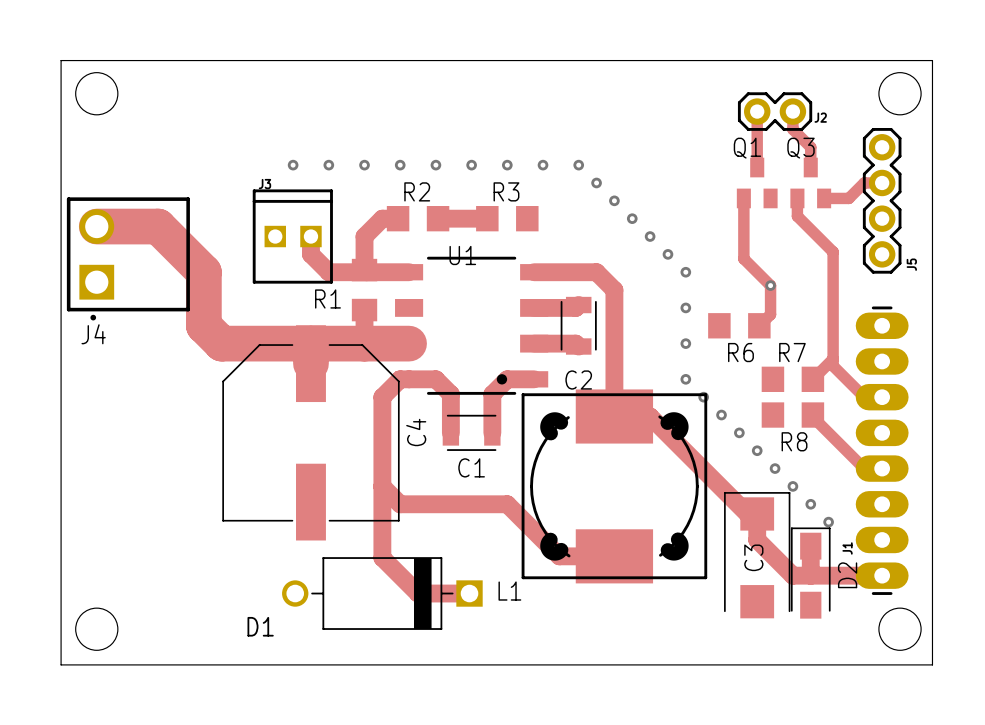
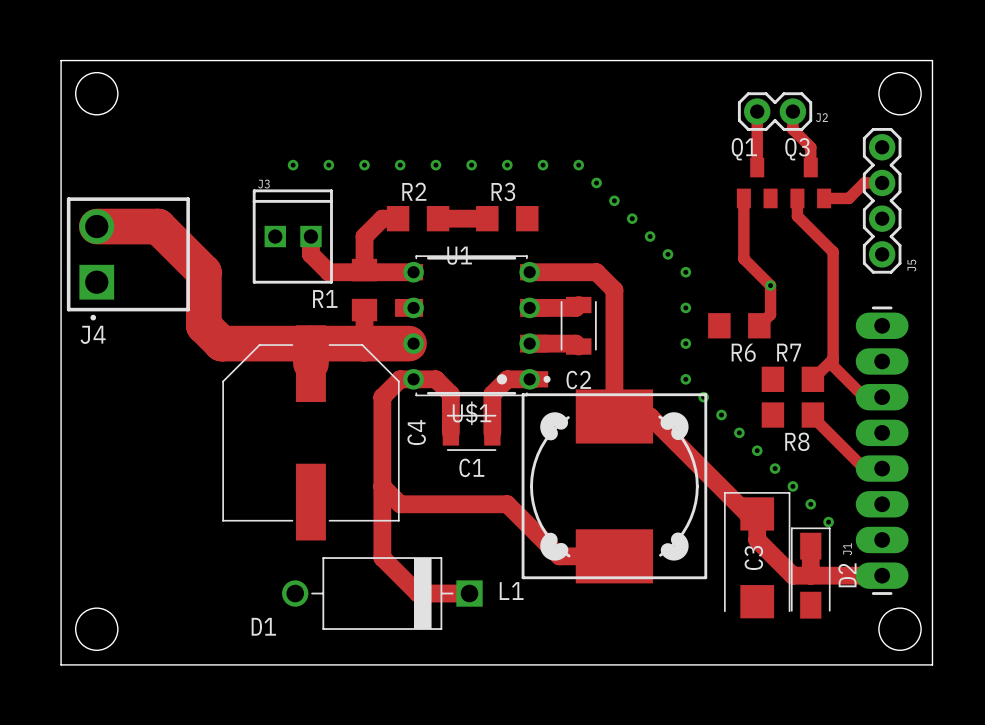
U$1: none -> (476, 325)

